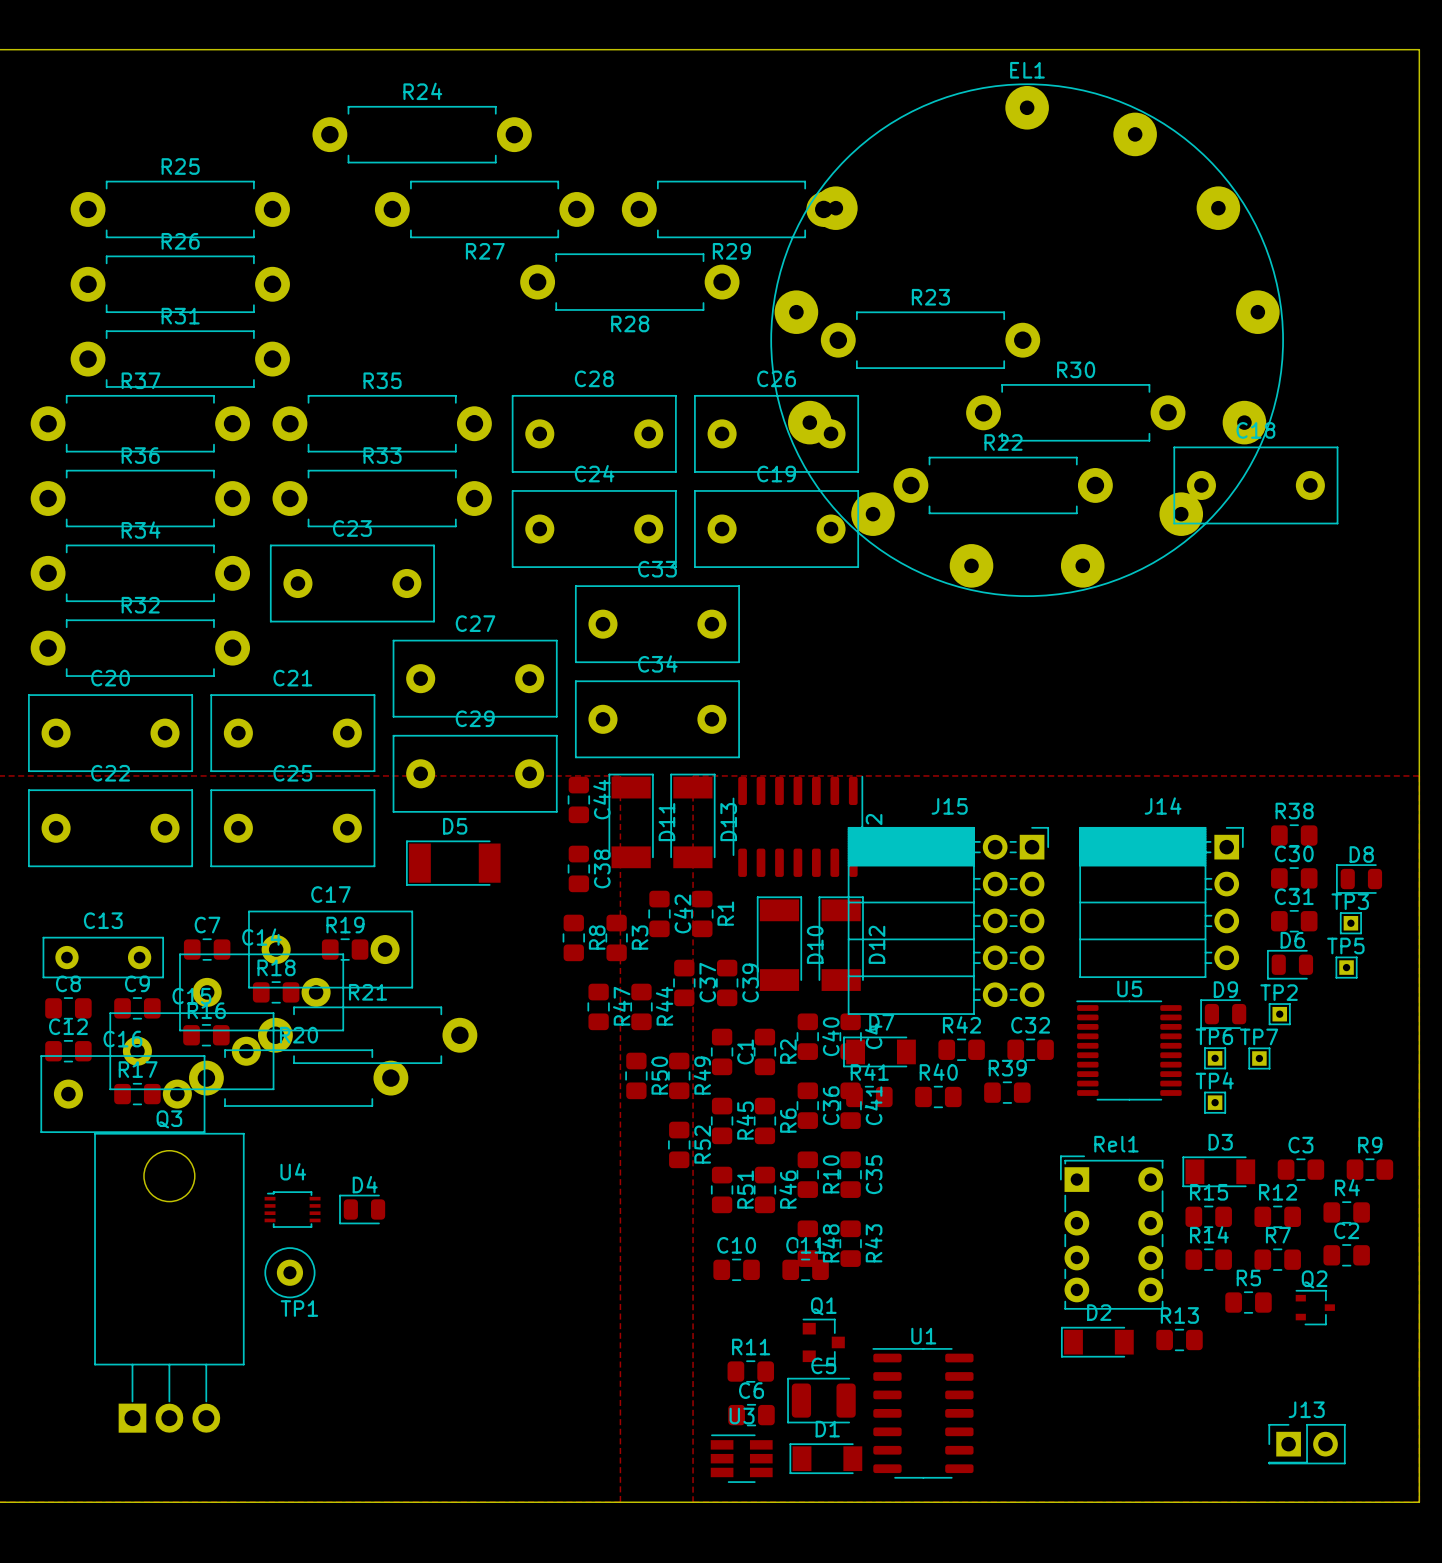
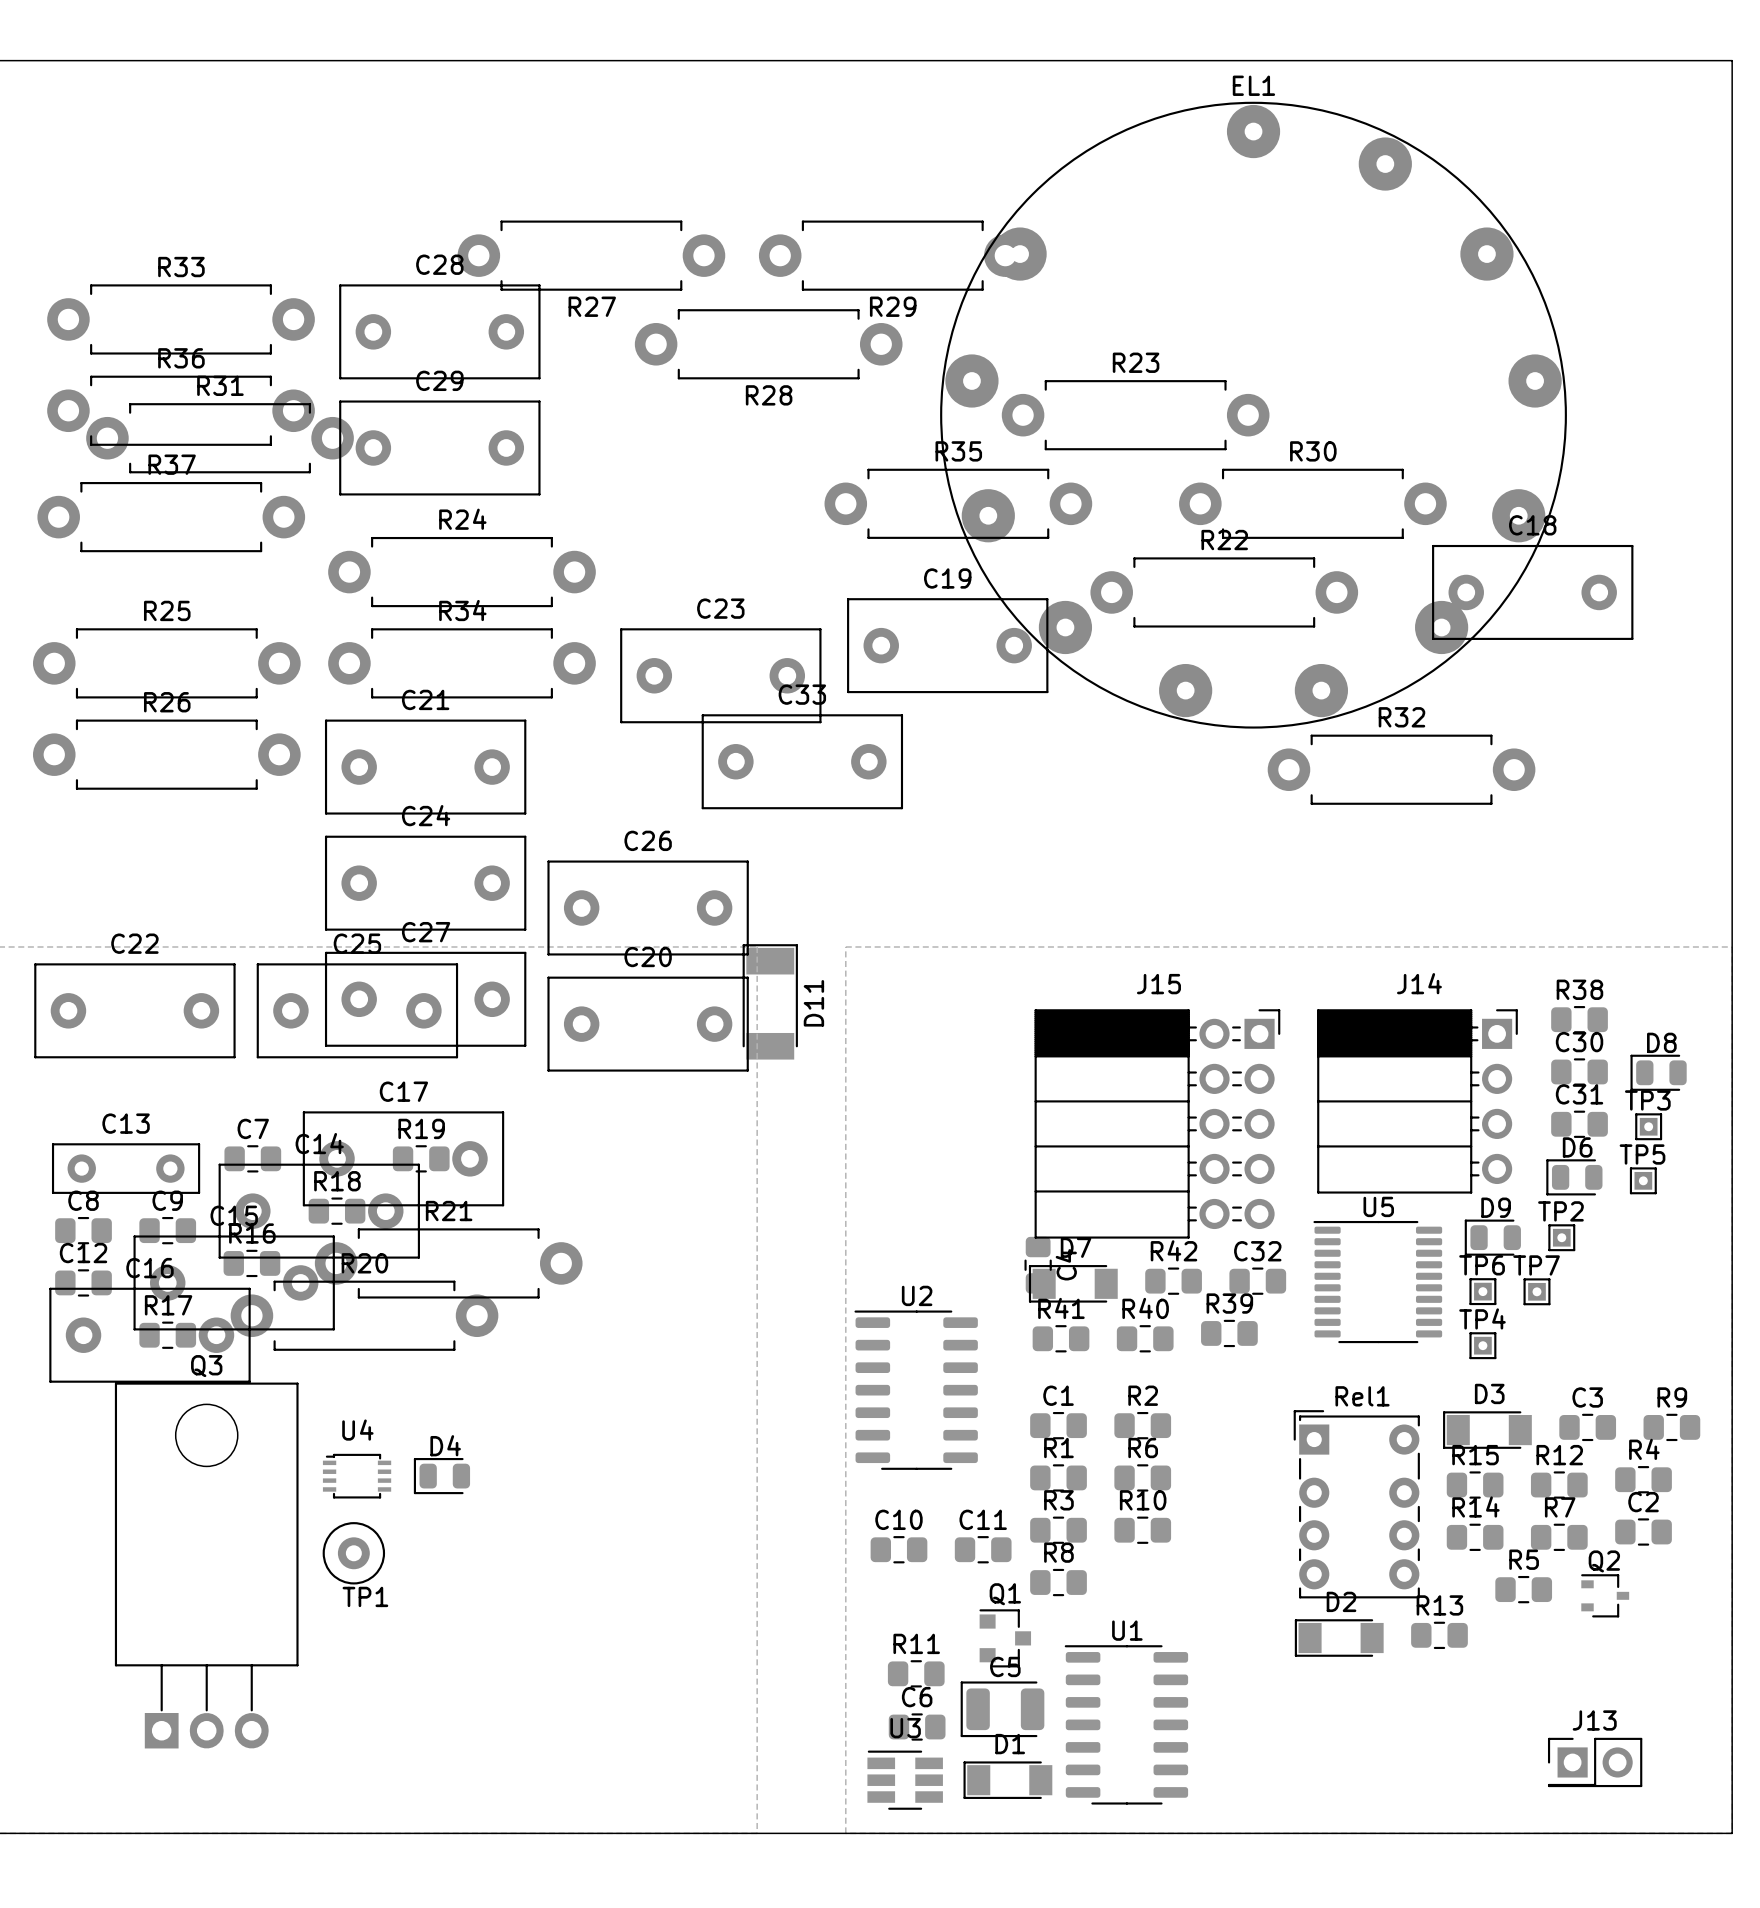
R24 position: (422, 134) -> (461, 572)
R25 position: (180, 209) -> (166, 663)
R26 position: (180, 284) -> (166, 754)
R35 position: (382, 423) -> (958, 503)
C28 position: (594, 433) -> (439, 331)
C26 position: (776, 433) -> (648, 908)
R36 position: (140, 498) -> (181, 410)
R33 position: (382, 498) -> (181, 319)
C24 position: (594, 529) -> (425, 883)
R34 position: (140, 573) -> (461, 663)
C23 position: (352, 583) -> (720, 675)
R32 position: (140, 648) -> (1401, 769)
C27 position: (475, 678) -> (425, 999)
C34: (657, 719) -> none
C20 position: (110, 733) -> (648, 1024)
C21 position: (292, 733) -> (425, 767)
C29 position: (475, 773) -> (439, 447)
C44: (578, 799) -> none
D13: (692, 820) -> none
U2 rotation: 0° (797, 826) -> 90° counterclockwise (916, 1390)
U2 position: (797, 826) -> (916, 1390)
D5: (453, 863) -> none
C38: (578, 868) -> none
C42: (659, 913) -> none
R1 rotation: 0° (702, 913) -> 90° clockwise (1058, 1477)
R1 position: (702, 913) -> (1058, 1477)
R1 name position: R1 (725, 913) -> R1 (1058, 1448)
R8 rotation: 0° (573, 937) -> 90° clockwise (1058, 1582)
R8 position: (573, 937) -> (1058, 1582)
R8 name position: R8 (597, 937) -> R8 (1058, 1552)
R3 rotation: 0° (616, 937) -> 90° clockwise (1058, 1530)
R3 position: (616, 937) -> (1058, 1530)
R3 name position: R3 (640, 937) -> R3 (1058, 1500)
D10: (779, 943) -> none
D12: (841, 943) -> none
C37: (684, 982) -> none
C39: (727, 982) -> none
R47: (598, 1006) -> none
R44: (641, 1006) -> none
C40: (807, 1036) -> none
C1 rotation: 0° (722, 1051) -> 90° clockwise (1058, 1425)
C1 position: (722, 1051) -> (1058, 1425)
C1 name position: C1 (745, 1051) -> C1 (1058, 1395)
R2 rotation: 0° (764, 1051) -> 90° clockwise (1142, 1425)
R2 position: (764, 1051) -> (1142, 1425)
R2 name position: R2 (788, 1051) -> R2 (1143, 1395)
R50: (636, 1075) -> none
R49: (679, 1075) -> none
C36: (807, 1105) -> none
C41: (850, 1105) -> none
R45: (722, 1120) -> none
R6 rotation: 0° (764, 1120) -> 90° clockwise (1142, 1477)
R6 position: (764, 1120) -> (1142, 1477)
R6 name position: R6 (788, 1120) -> R6 (1143, 1448)
R52: (679, 1144) -> none
R10 rotation: 0° (807, 1174) -> 90° clockwise (1142, 1530)
R10 position: (807, 1174) -> (1142, 1530)
R10 name position: R10 (831, 1174) -> R10 (1143, 1500)
C35: (850, 1174) -> none
R51: (722, 1189) -> none
R46: (764, 1189) -> none
R48: (807, 1243) -> none
R43: (850, 1243) -> none

